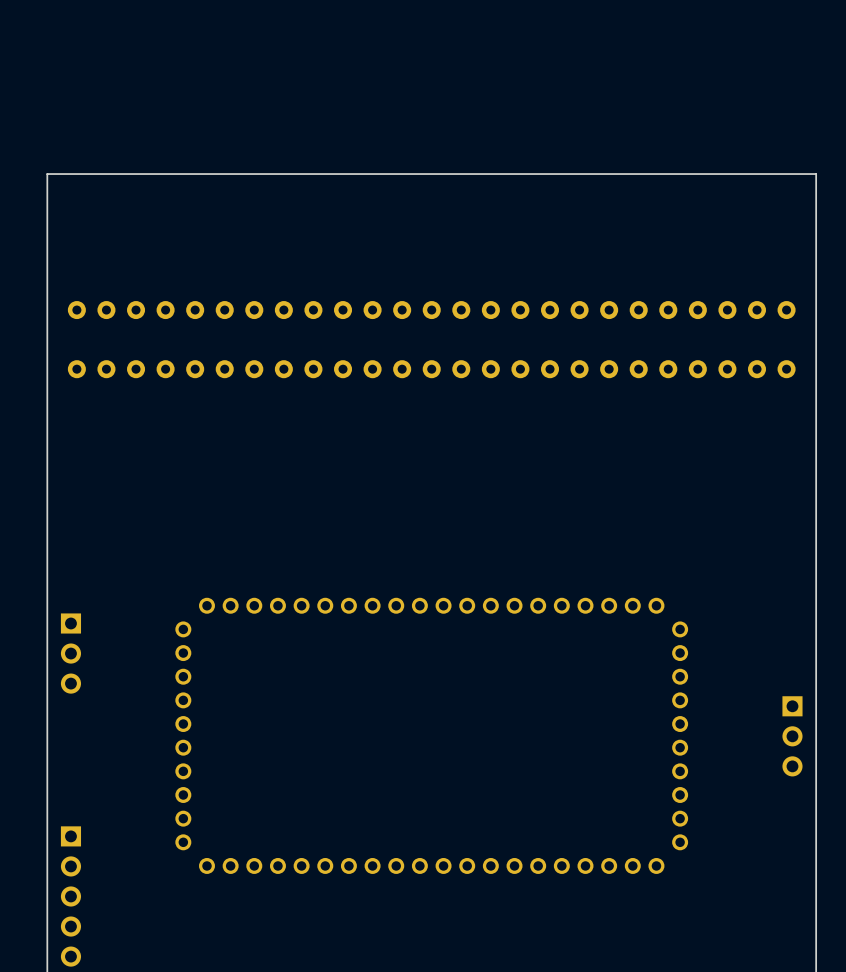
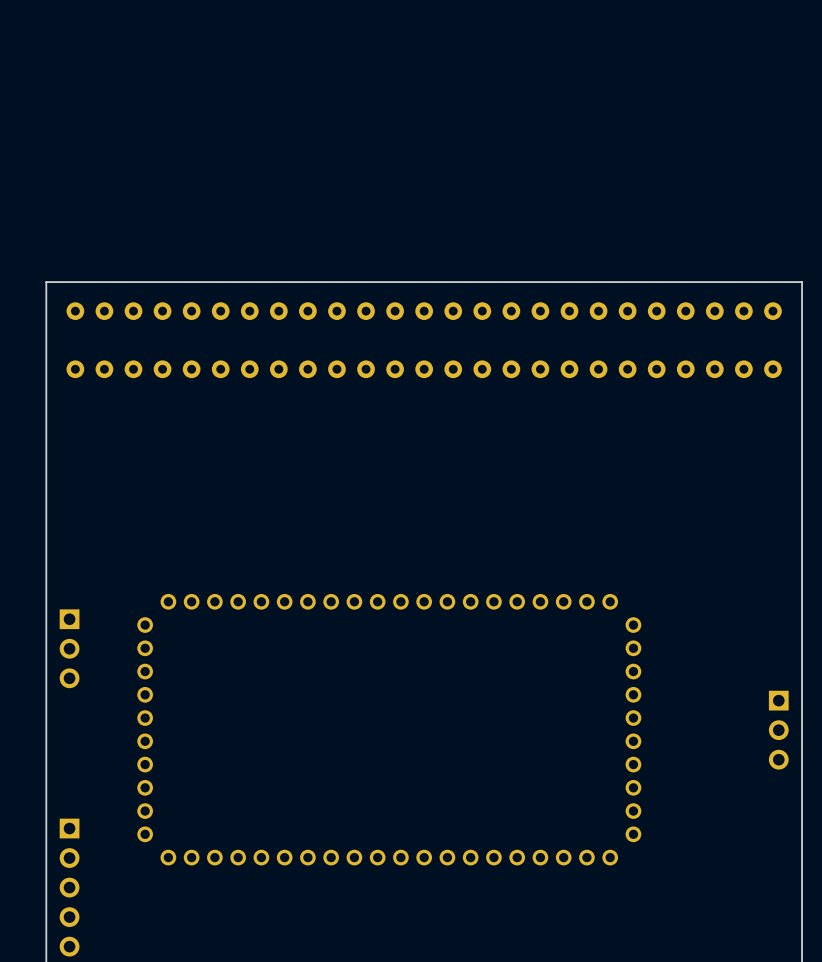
board edge: (816, 280) (816, 174) (47, 174) (47, 280) -> (802, 282) (46, 282)
part position: (431, 735) -> (389, 729)

